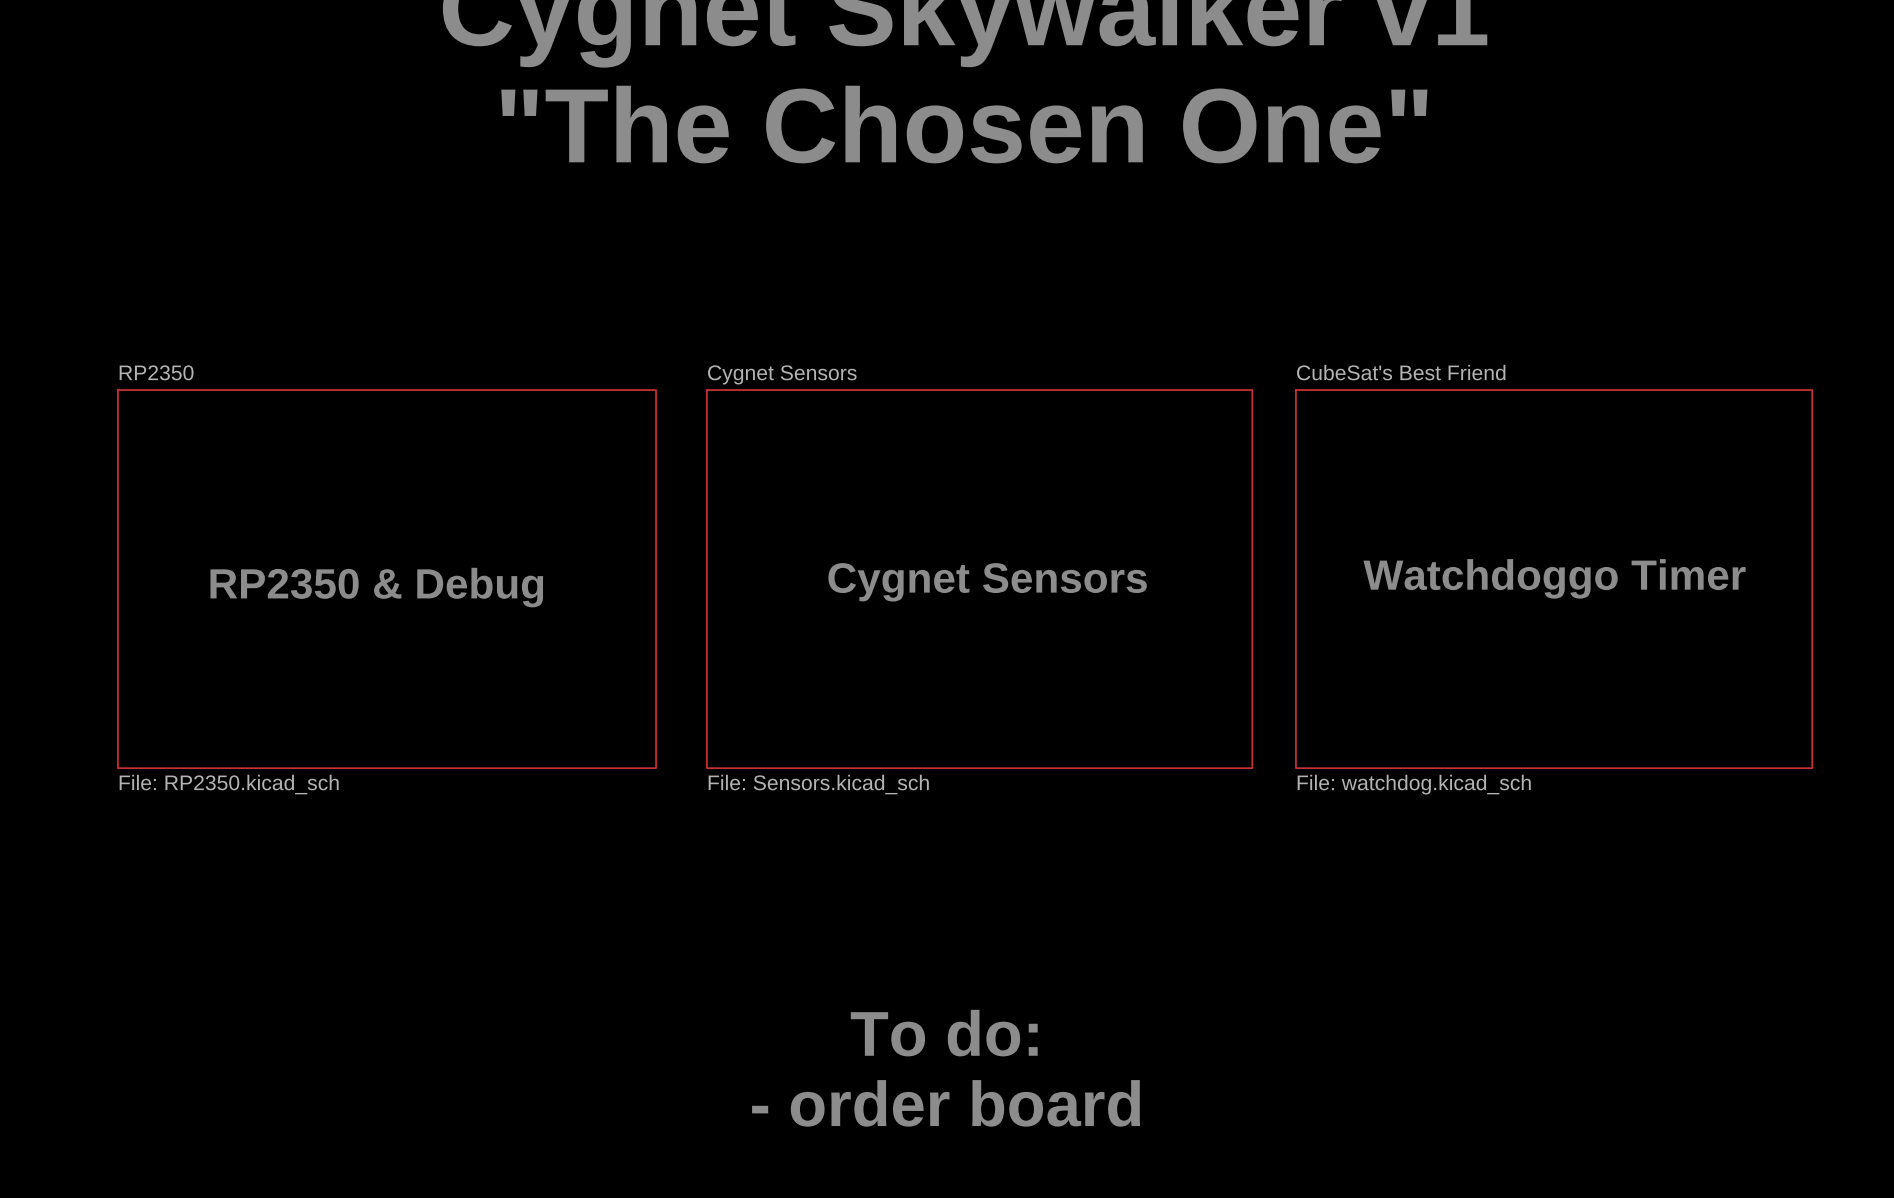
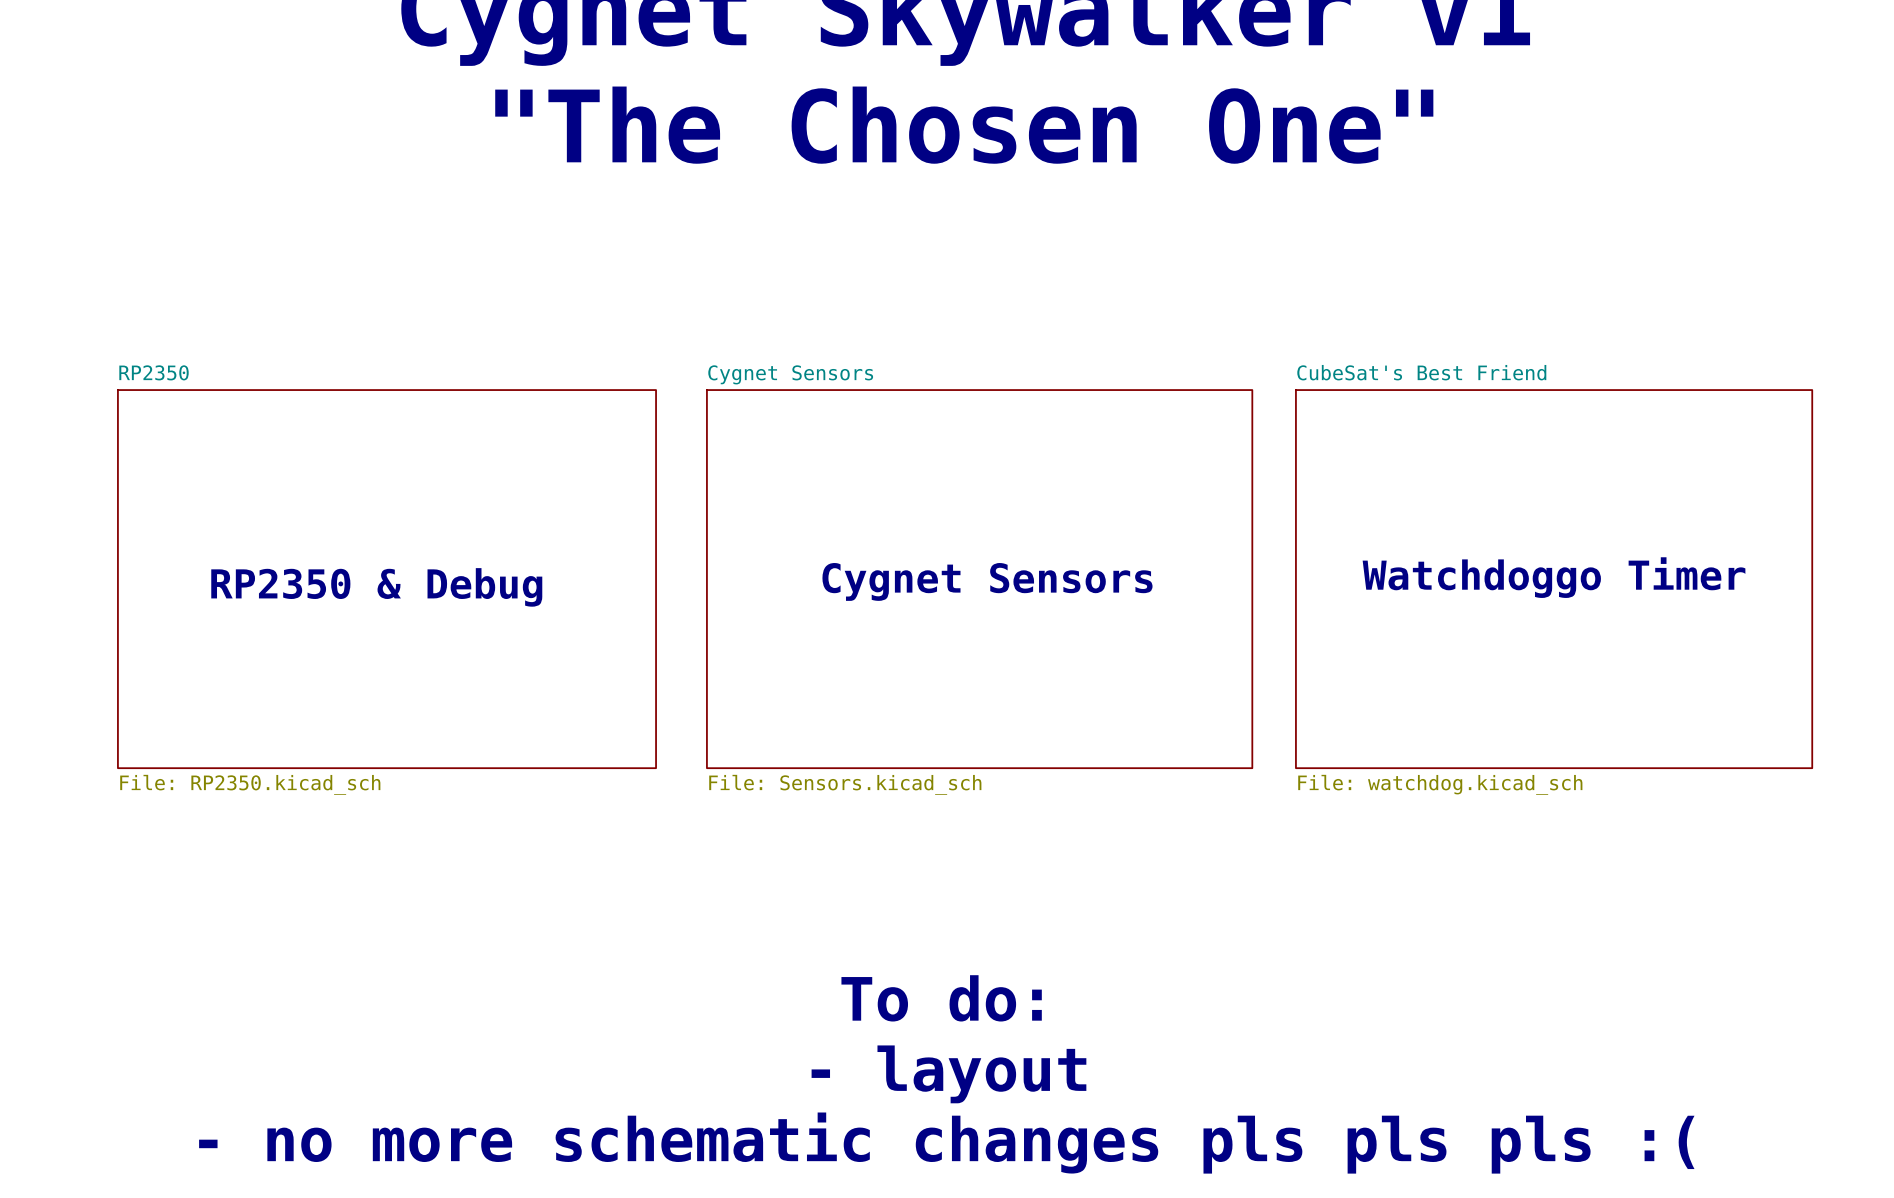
text position: To do: (944, 1033) -> To do: (941, 998)
text: none -> - layout (948, 1074)
text: - order board (946, 1103) -> none
text: none -> - no more schematic changes pls pls pls :( (946, 1143)

